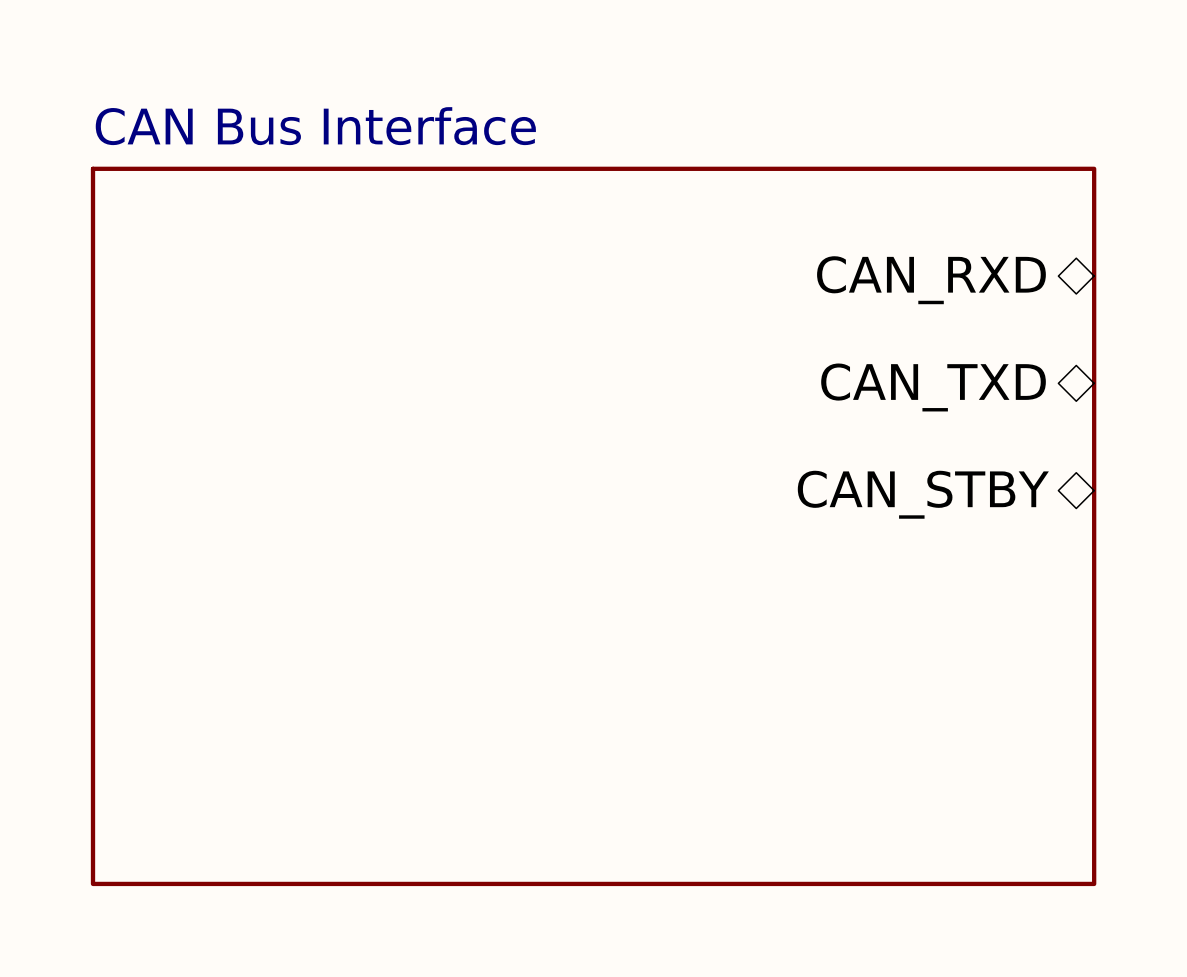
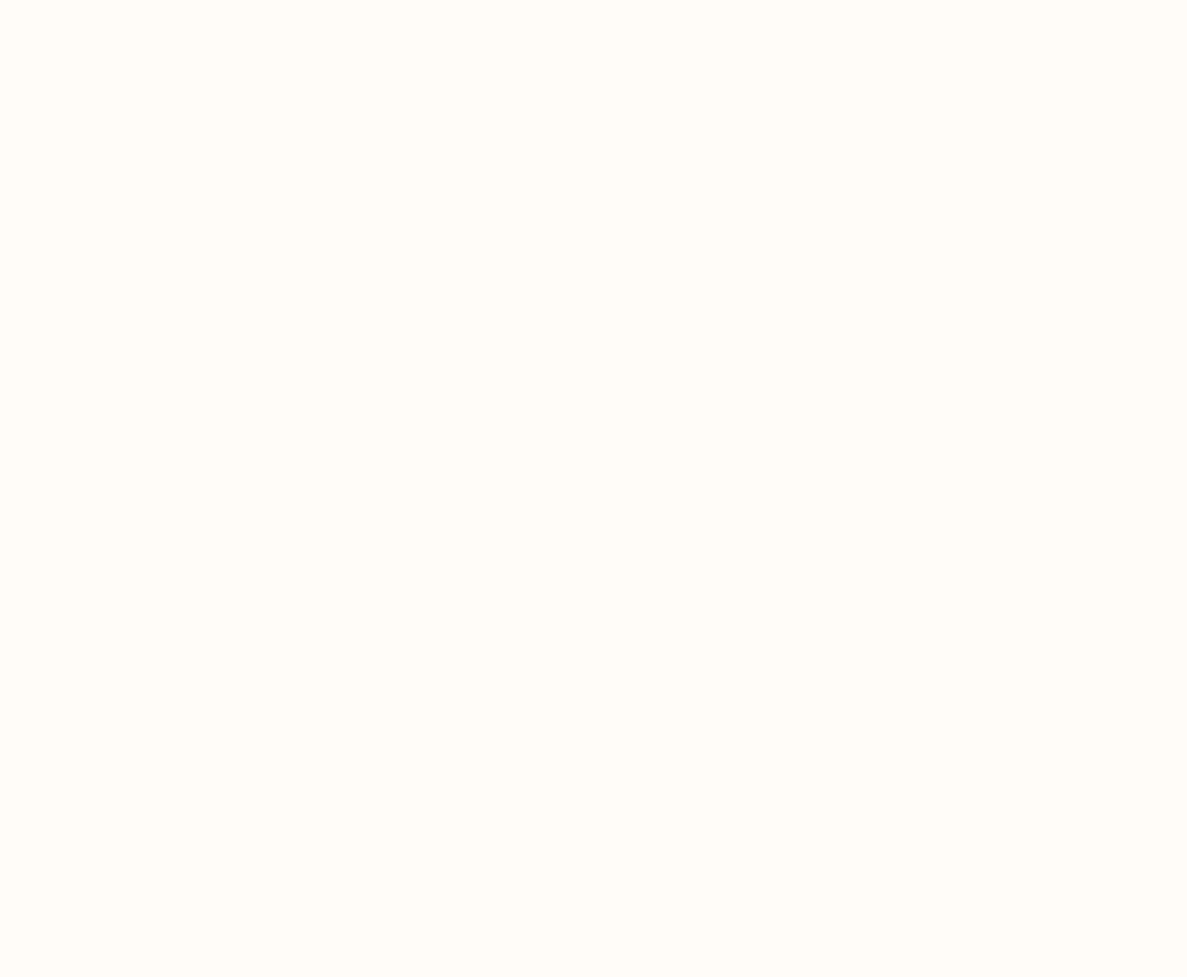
sheet pin: CAN_RXD (931, 280) -> none
sheet pin: CAN_TXD (933, 387) -> none
sheet pin: CAN_STBY (923, 494) -> none
sheet CAN Bus Interface: (593, 526) -> none

